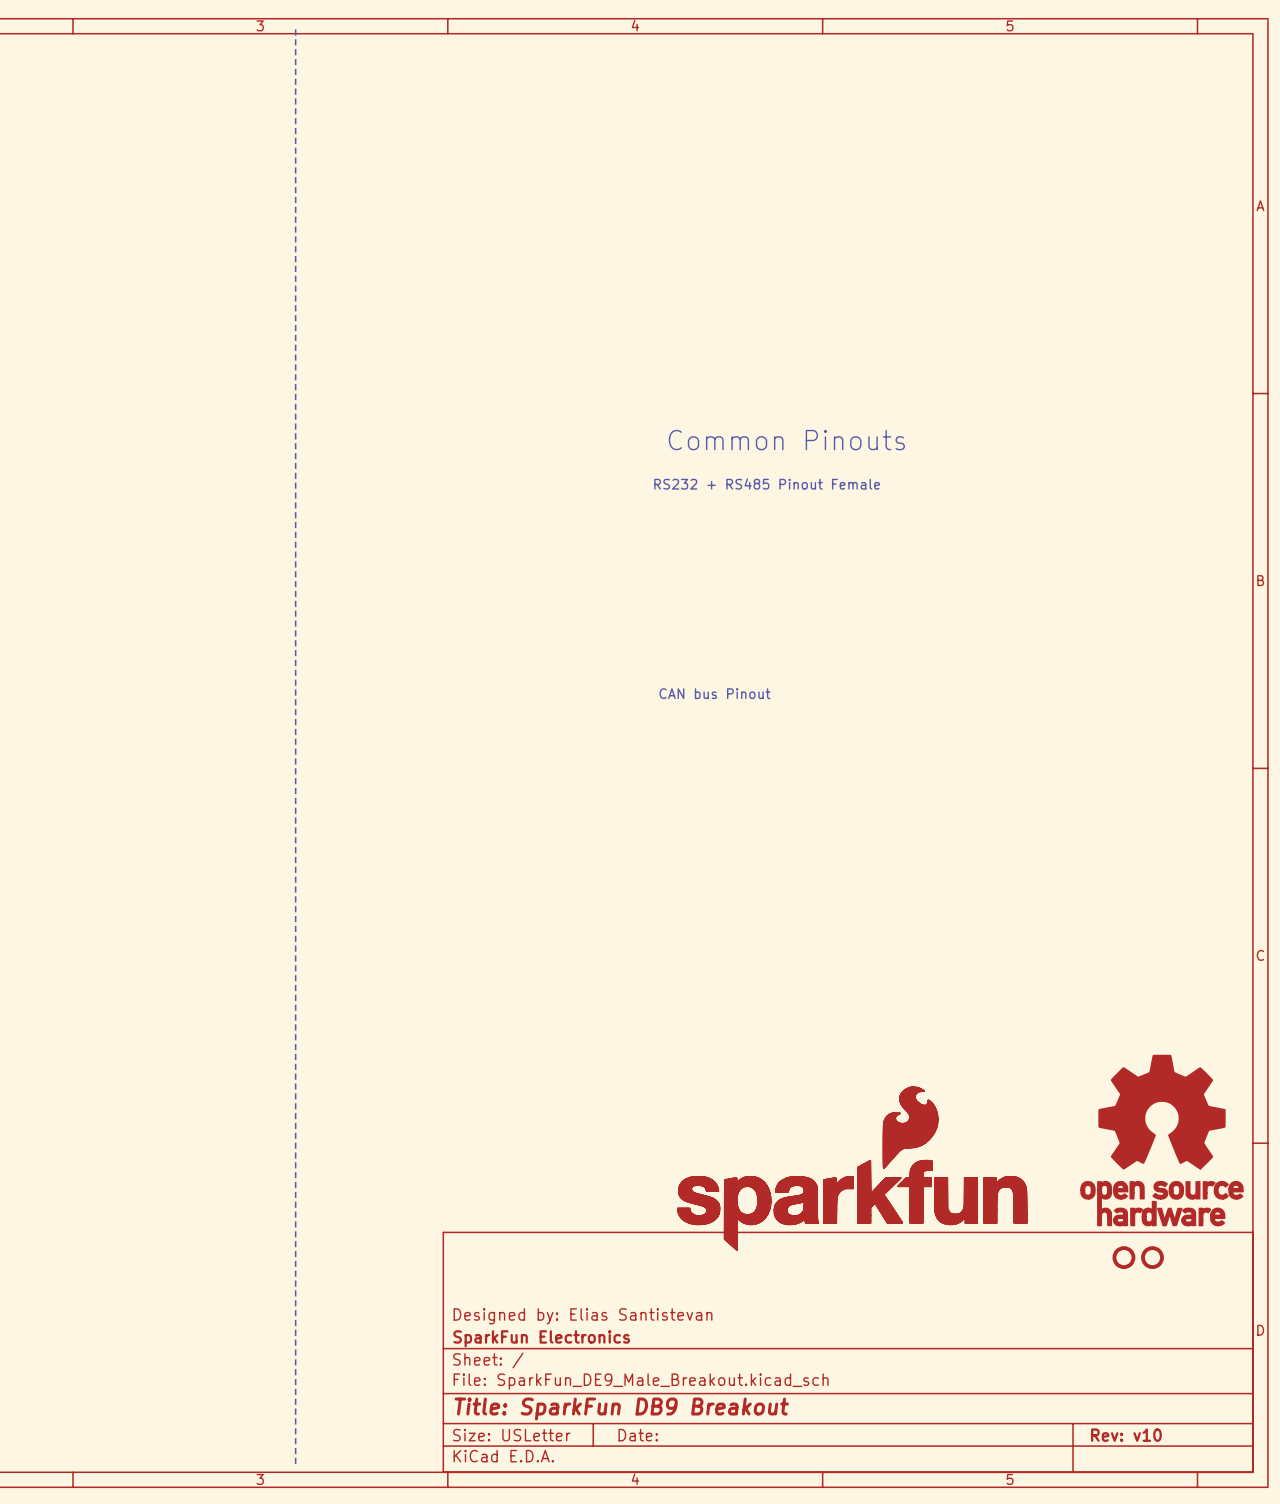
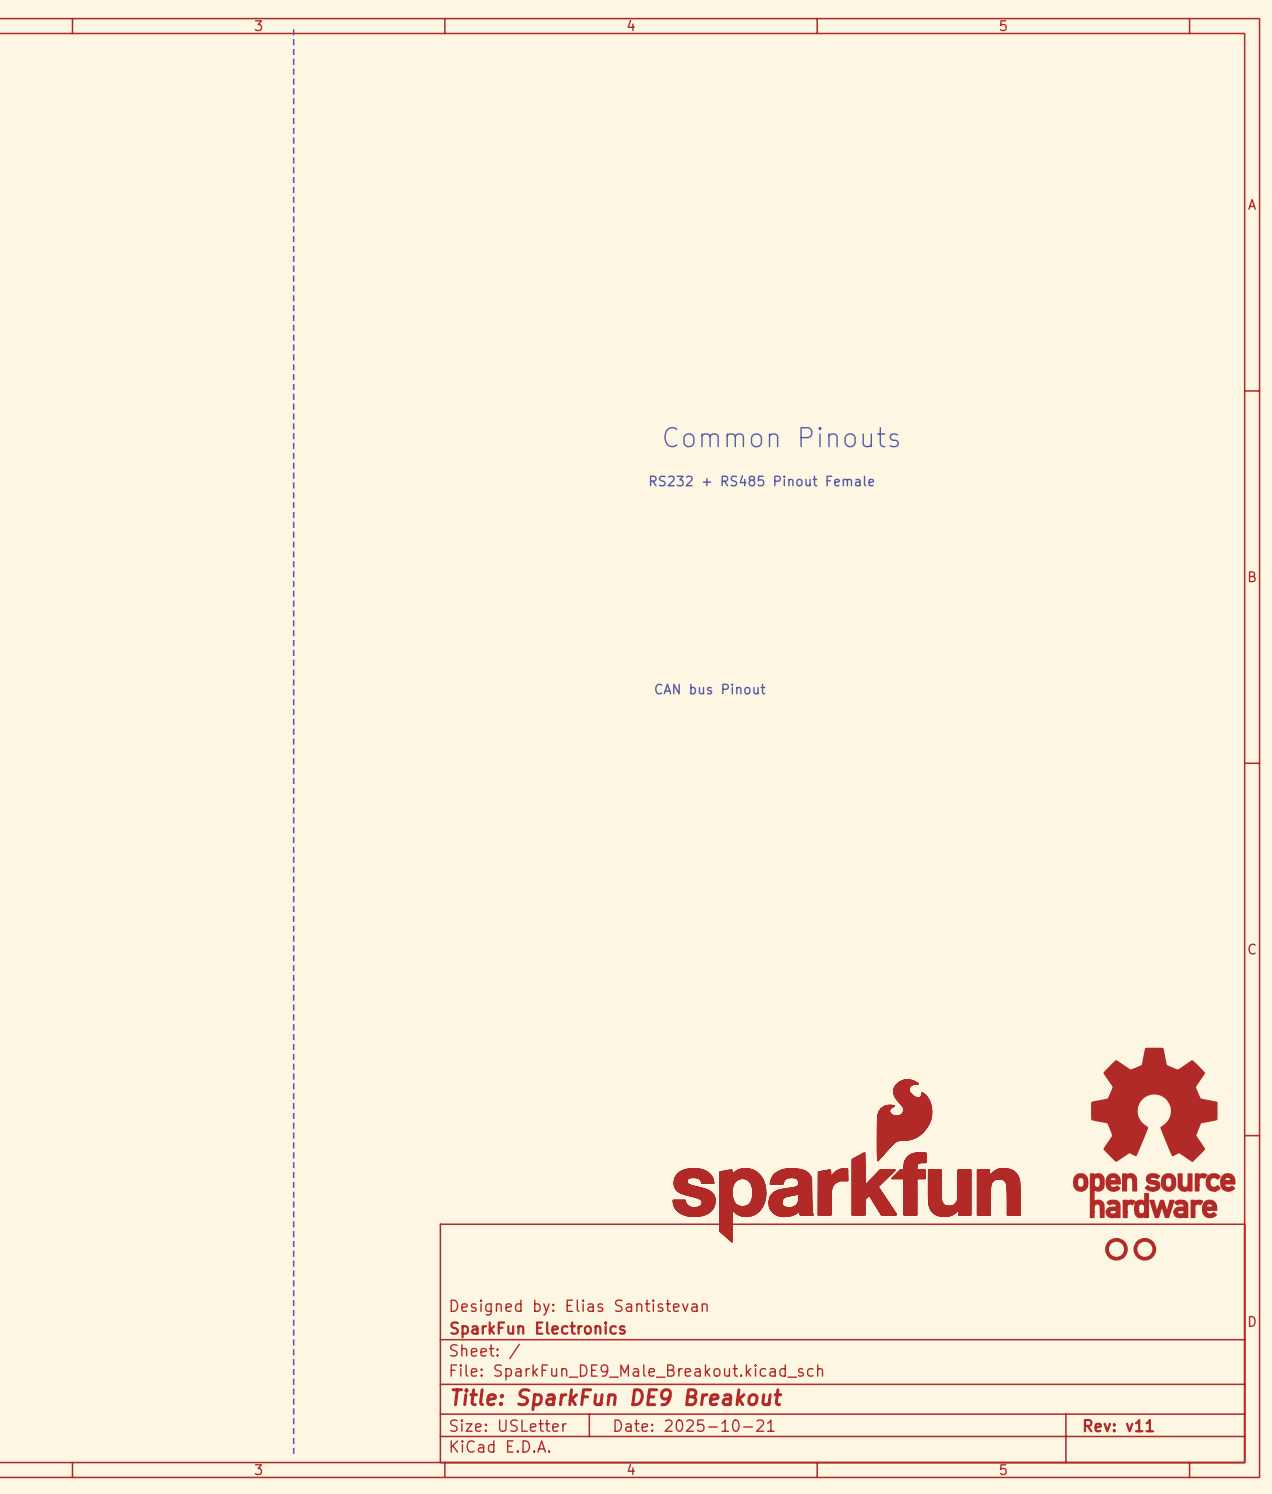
title block: Title: SparkFun DB9 Breakout (621, 1409) -> Title: SparkFun DE9 Breakout (616, 1399)
title block: Date: (638, 1435) -> Date: 2025-10-21 (694, 1425)
title block: Rev: v10 (1126, 1435) -> Rev: v11 (1118, 1425)

